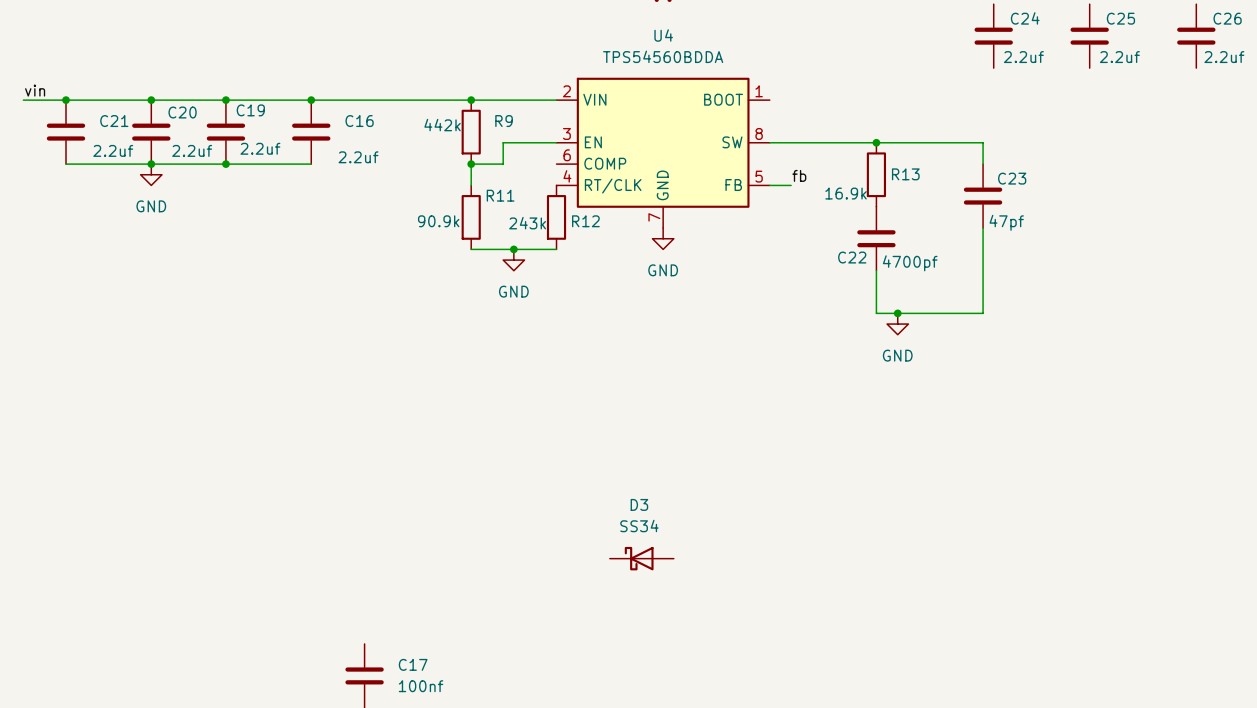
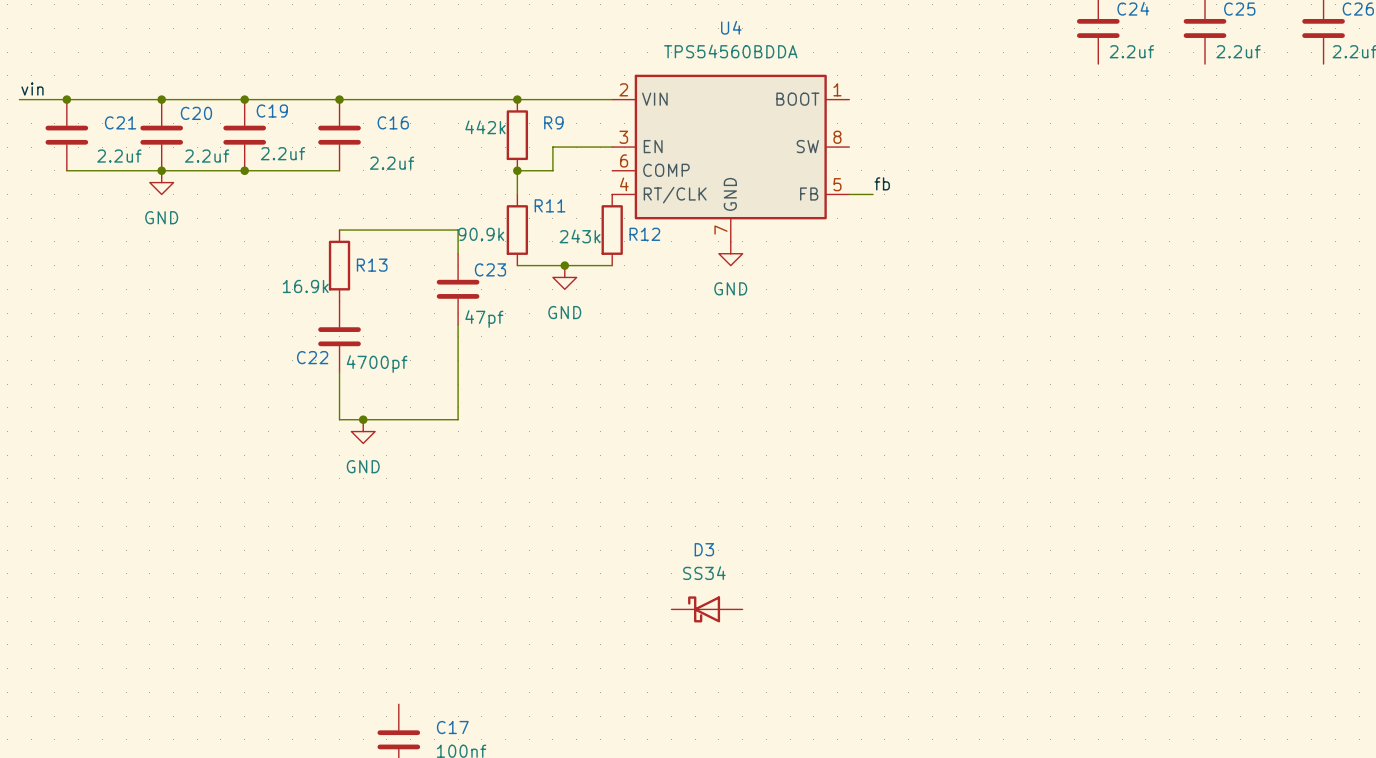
wire: (769, 142) (983, 142) (983, 164) -> none
junction: (876, 142) -> none
R13 position: (876, 174) -> (339, 265)
C23 position: (983, 196) -> (458, 289)
wire: none -> (339, 230) (458, 230) (458, 253)
wire: (983, 228) (983, 313) (876, 313) (876, 270) -> none
C22 position: (876, 238) -> (339, 336)
wire: none -> (458, 324) (458, 419) (339, 419) (339, 372)
junction: (897, 313) -> none
power symbol: GND (897, 324) -> none
junction: none -> (363, 419)
power symbol: none -> GND (363, 431)

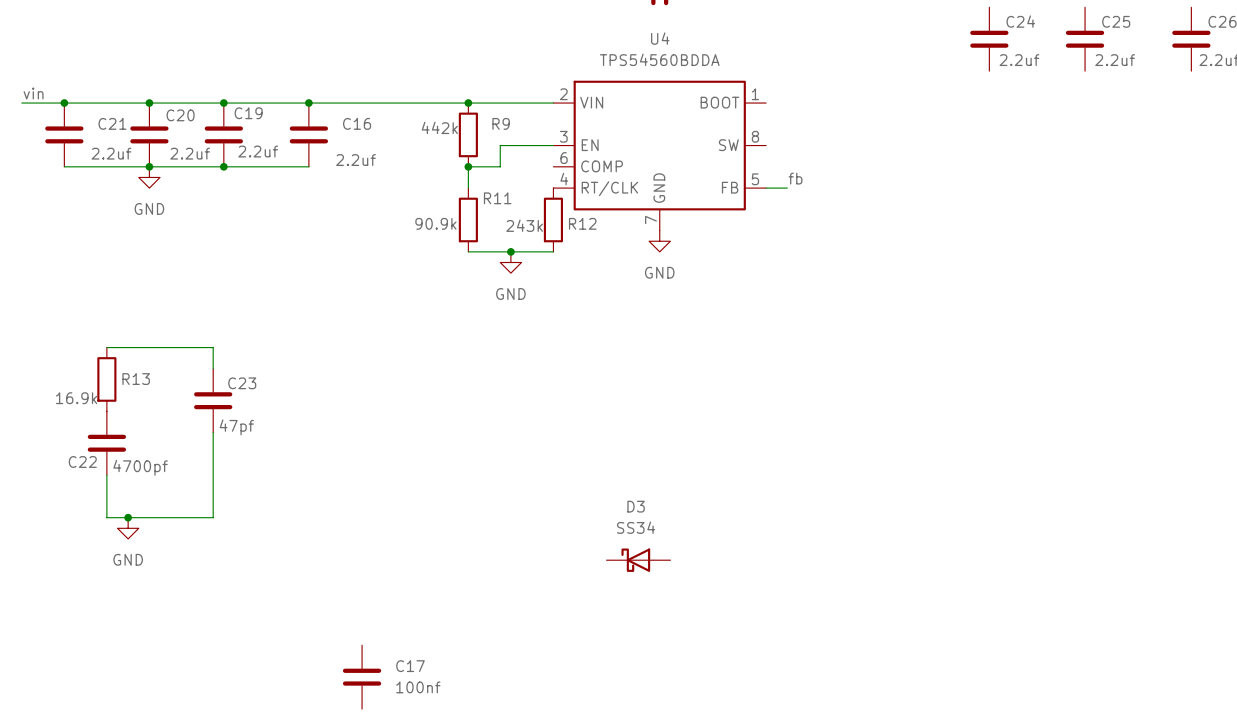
wire: (339, 230) (458, 230) (458, 253) -> none
R13 position: (339, 265) -> (106, 379)
C23 position: (458, 289) -> (213, 400)
wire: (458, 324) (458, 419) (339, 419) (339, 372) -> none
C22 position: (339, 336) -> (106, 443)
wire: none -> (106, 347) (213, 347) (213, 368)
junction: (363, 419) -> none
power symbol: GND (363, 431) -> none
wire: none -> (213, 432) (213, 517) (106, 517) (106, 475)
junction: none -> (128, 517)
power symbol: none -> GND (128, 528)

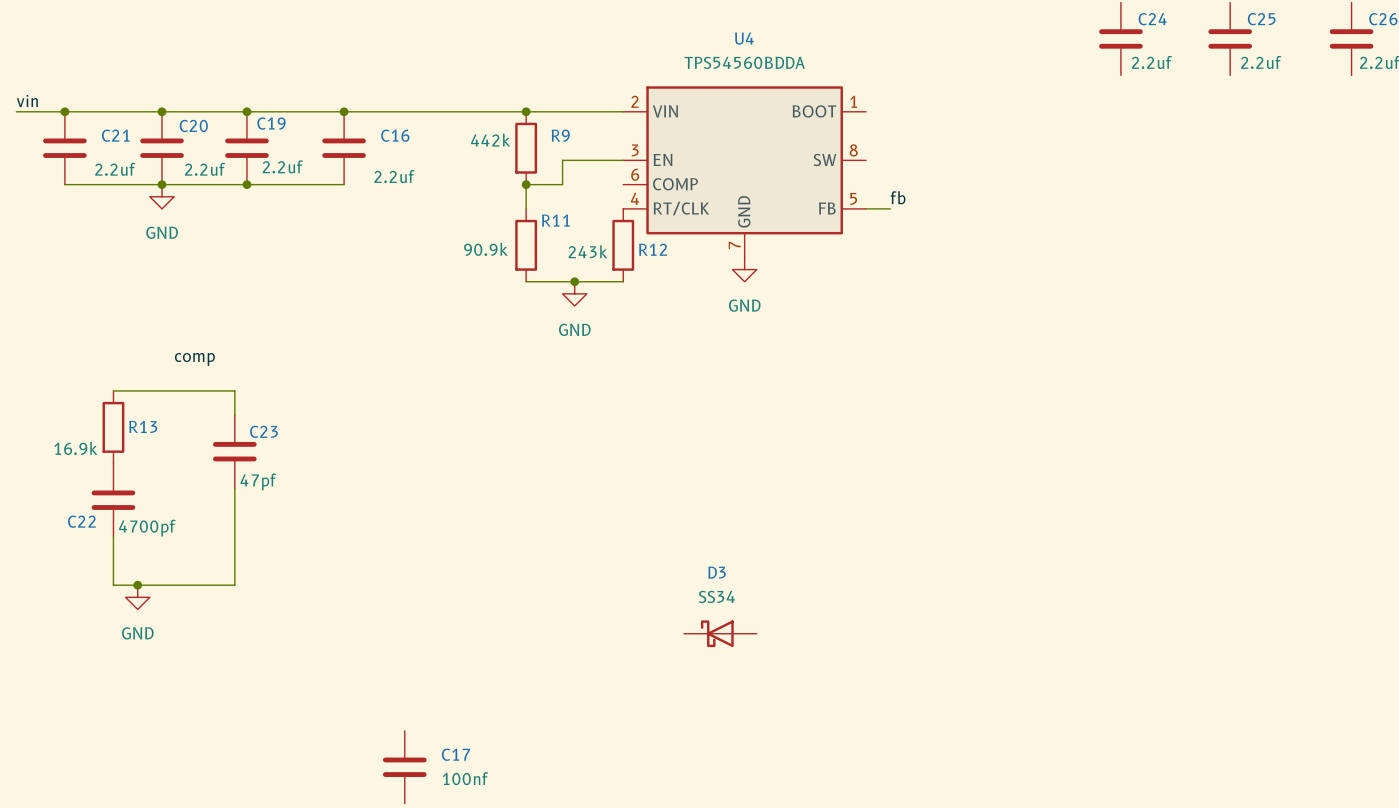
label: none -> comp (194, 359)

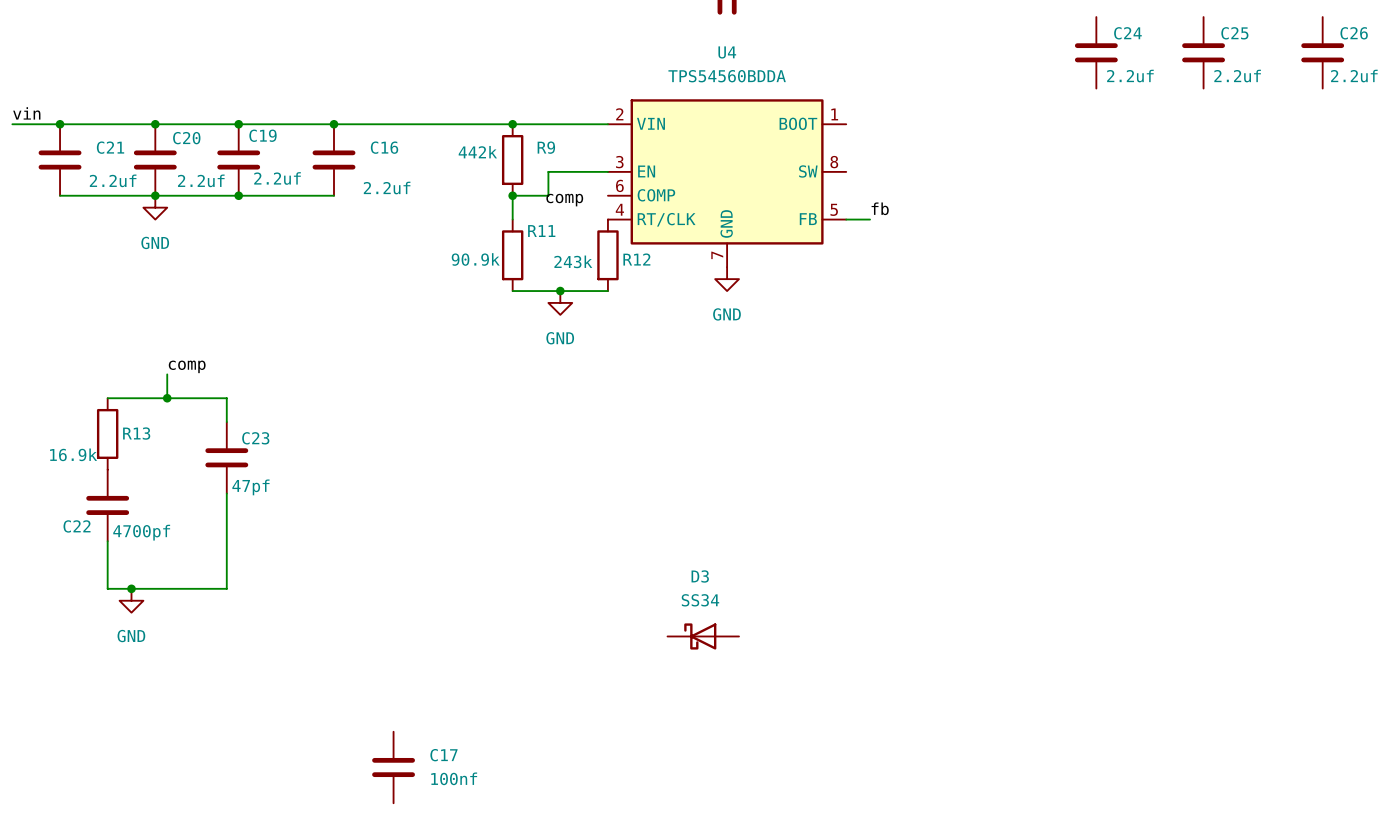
label: none -> comp (564, 200)
wire: none -> (167, 374) (167, 398)
junction: none -> (167, 398)

